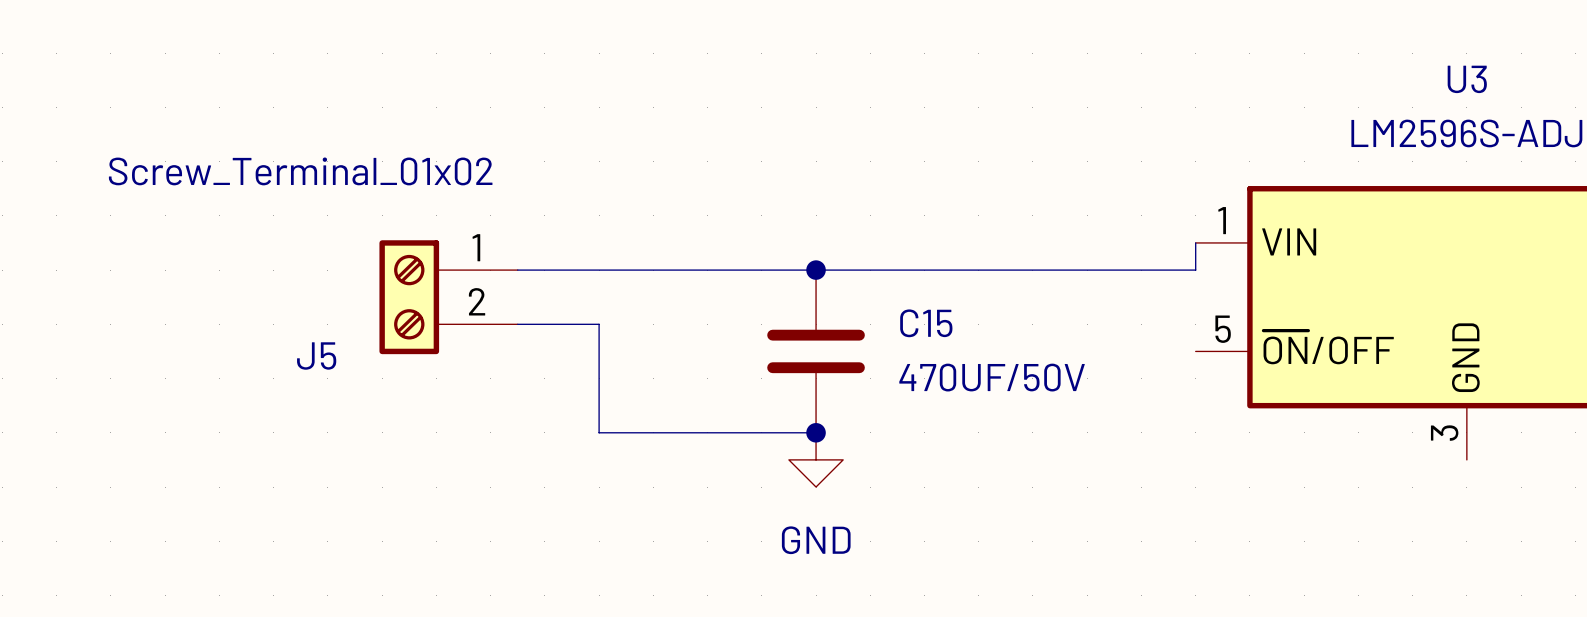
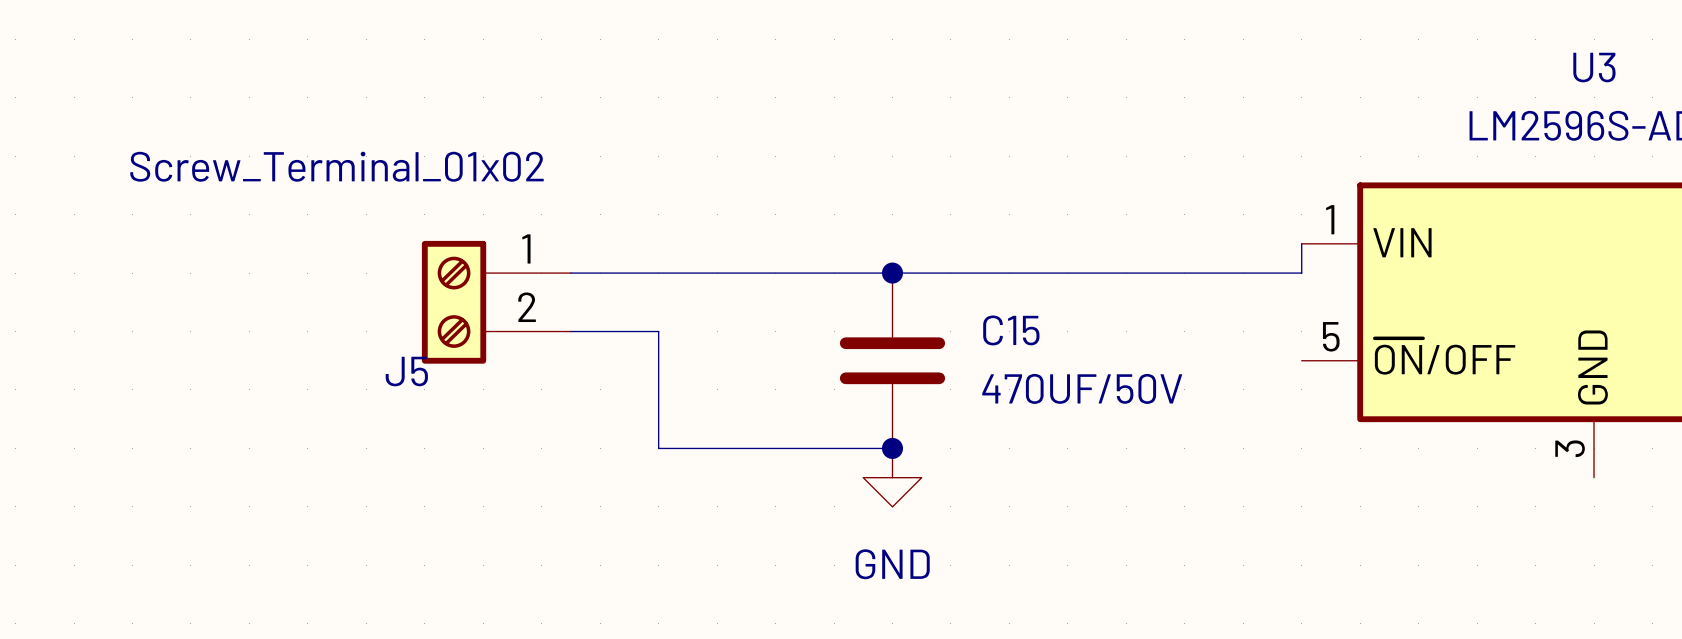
J5 name position: J5 (316, 356) -> J5 (406, 371)

